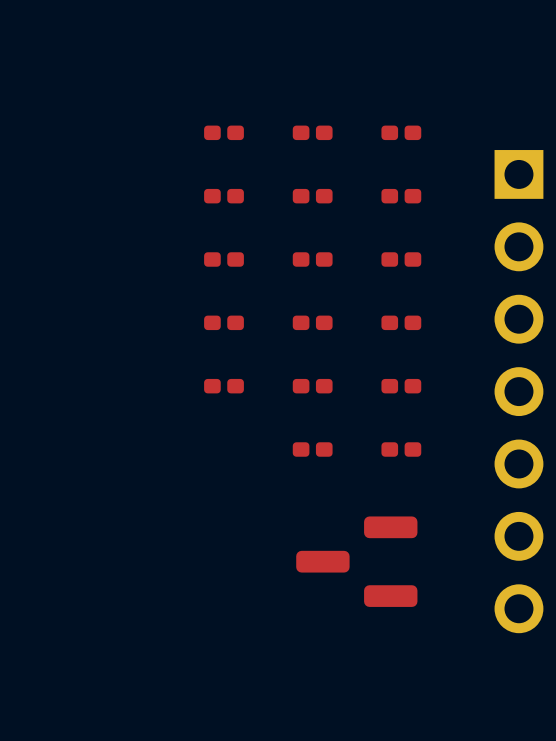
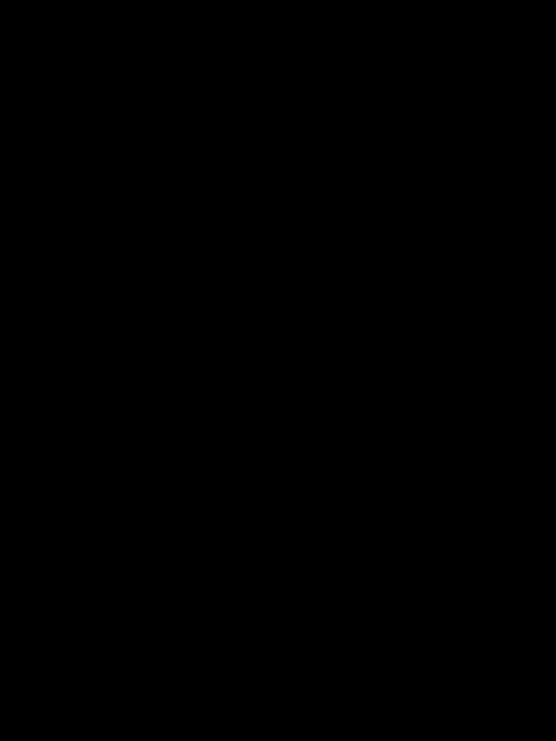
part: (224, 132) -> none
part: (312, 132) -> none
part: (401, 132) -> none
part: (224, 196) -> none
part: (312, 196) -> none
part: (401, 196) -> none
part: (224, 259) -> none
part: (312, 259) -> none
part: (401, 259) -> none
part: (224, 322) -> none
part: (312, 322) -> none
part: (401, 322) -> none
part: (224, 386) -> none
part: (312, 386) -> none
part: (401, 386) -> none
part: (518, 391) -> none
part: (312, 449) -> none
part: (401, 449) -> none
part: (356, 561) -> none

